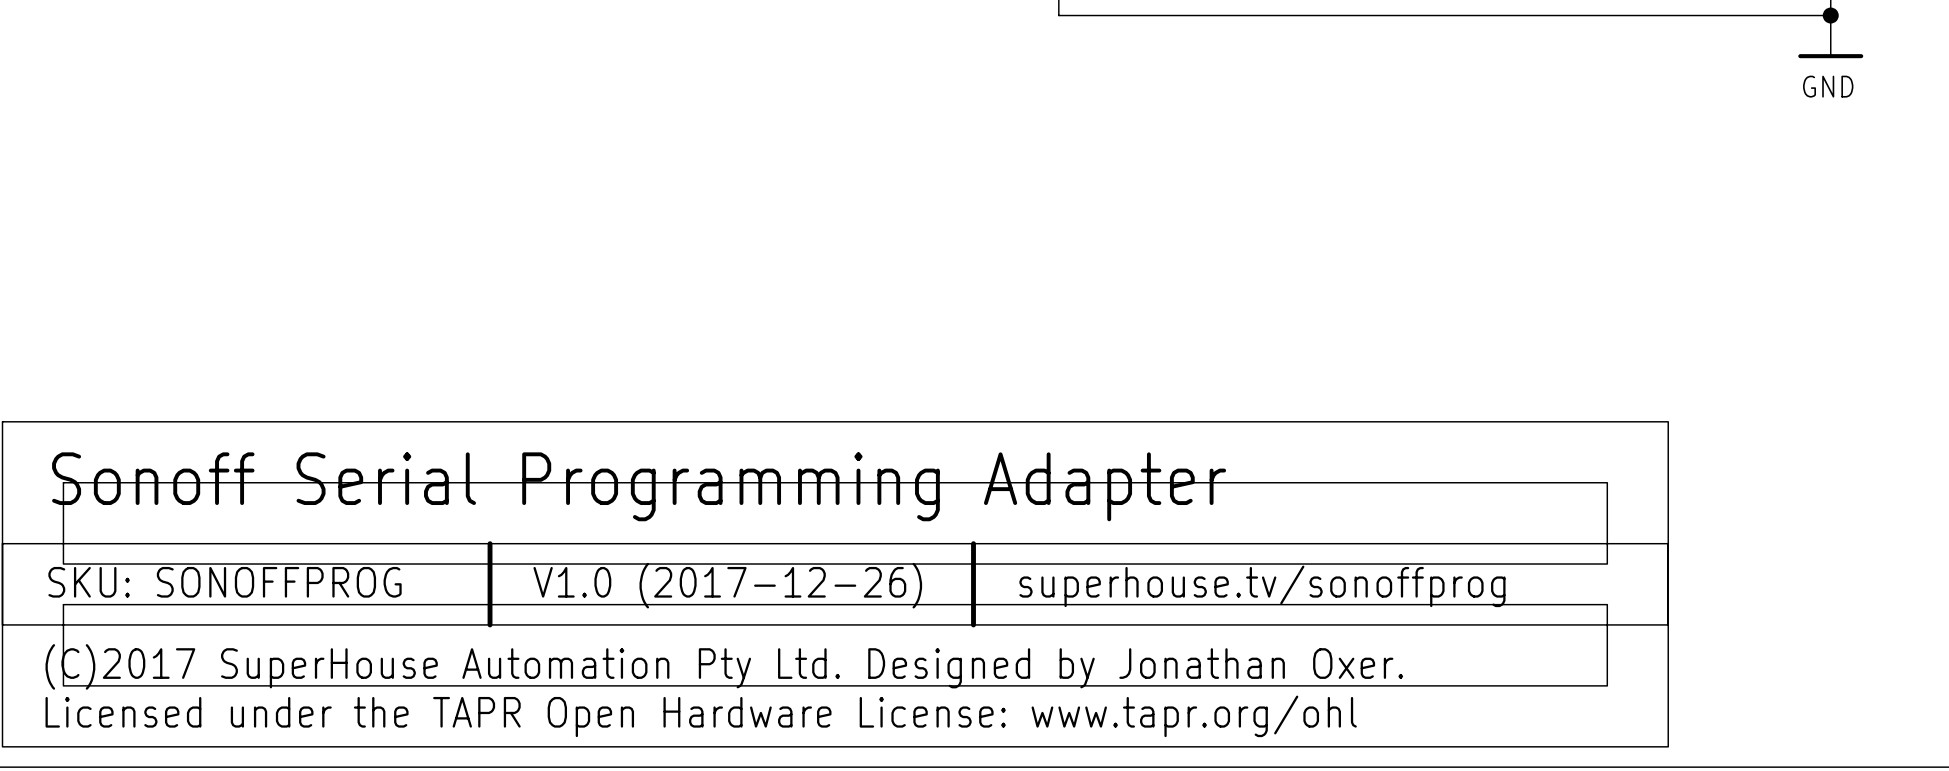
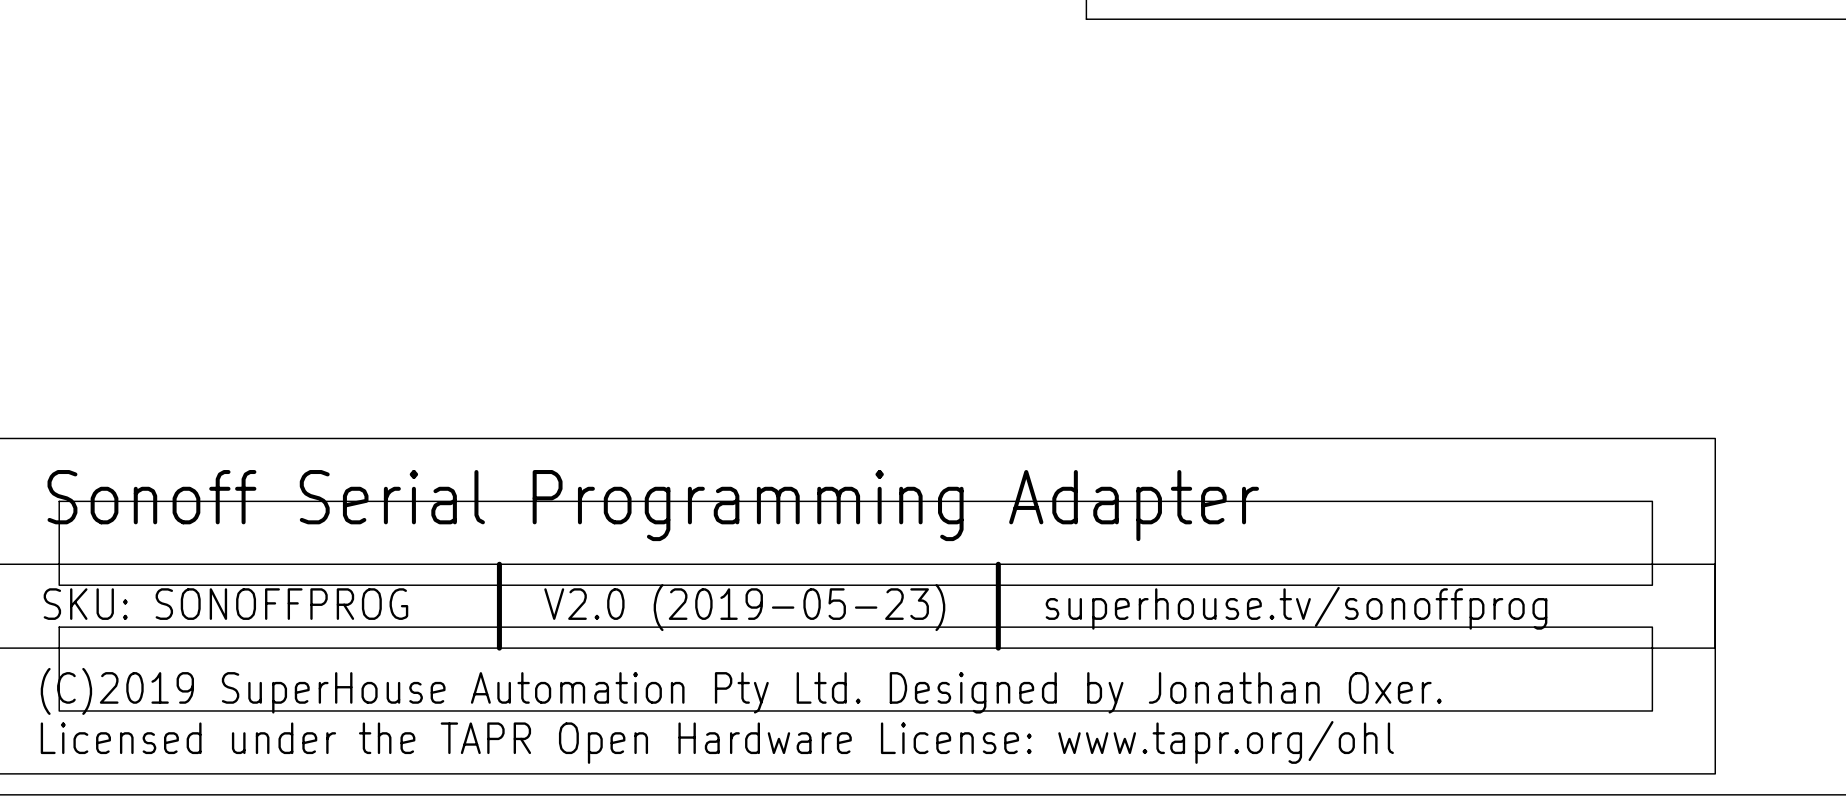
text: V1.0 (2017-12-26) (727, 585) -> V2.0 (2019-05-23) (744, 607)
text: (C)2017 SuperHouse Automation Pty Ltd. Designed by Jonathan Oxer. (724, 666) -> (C)2019 SuperHouse Automation Pty Ltd. Designed by Jonathan Oxer. (741, 691)

